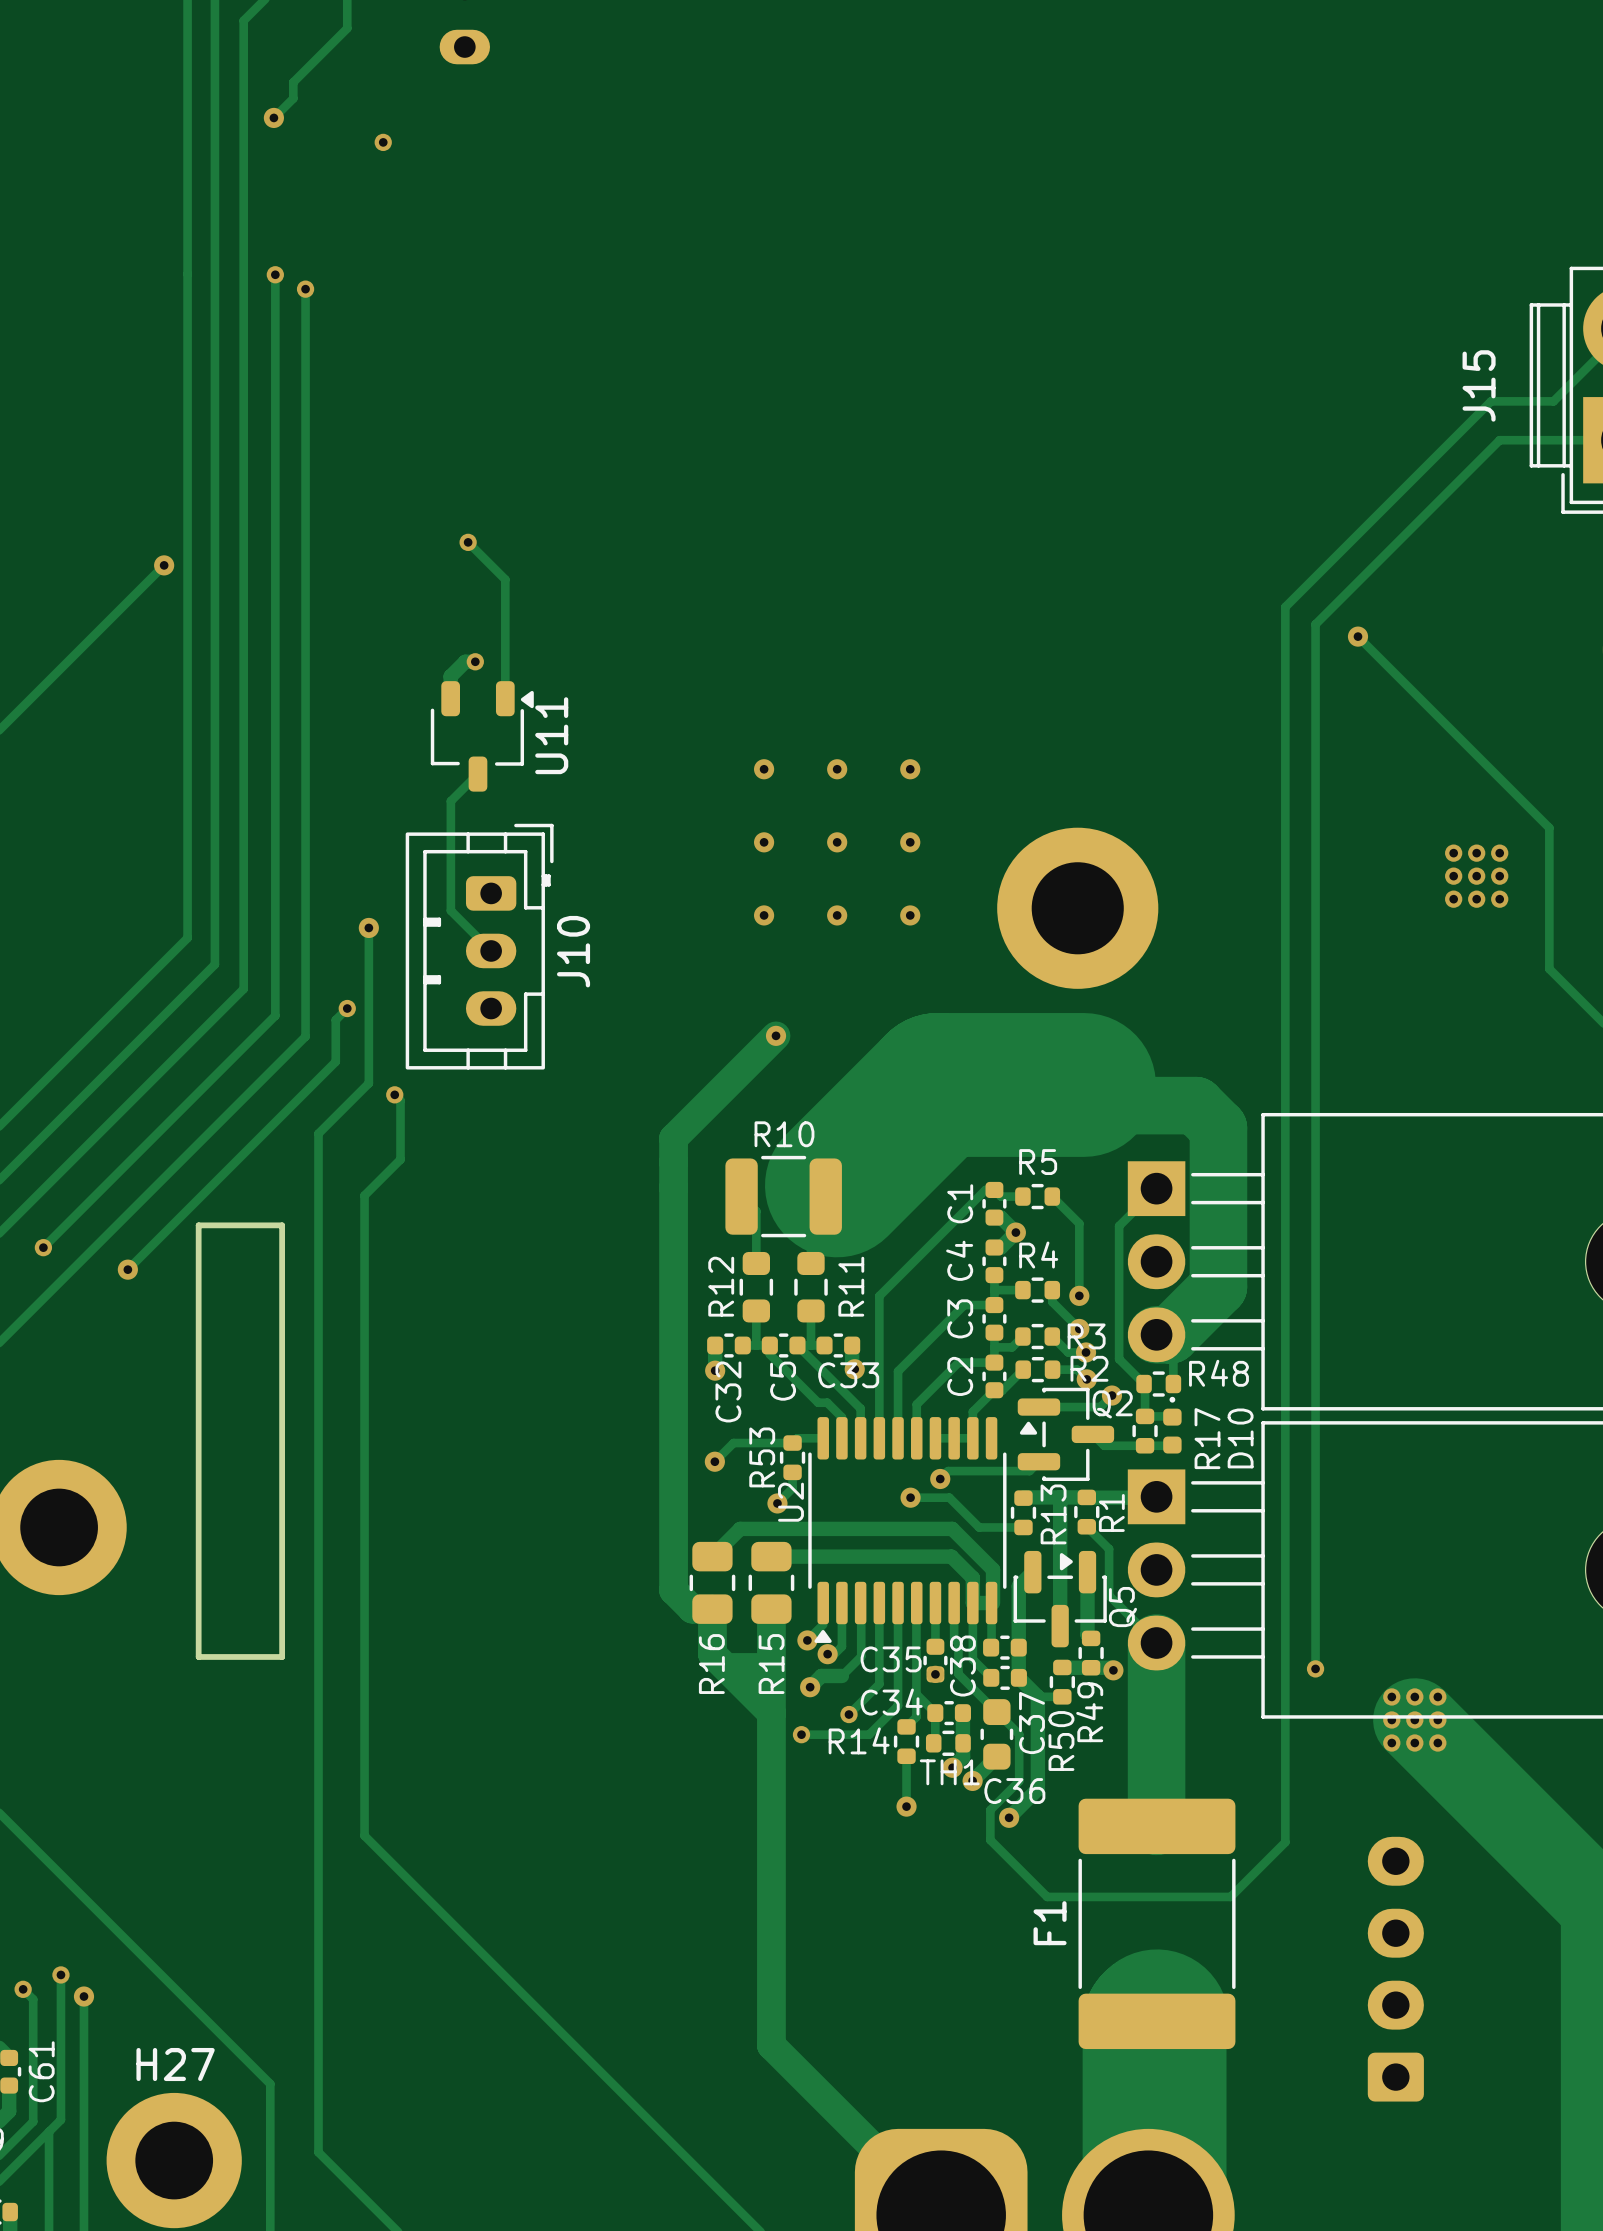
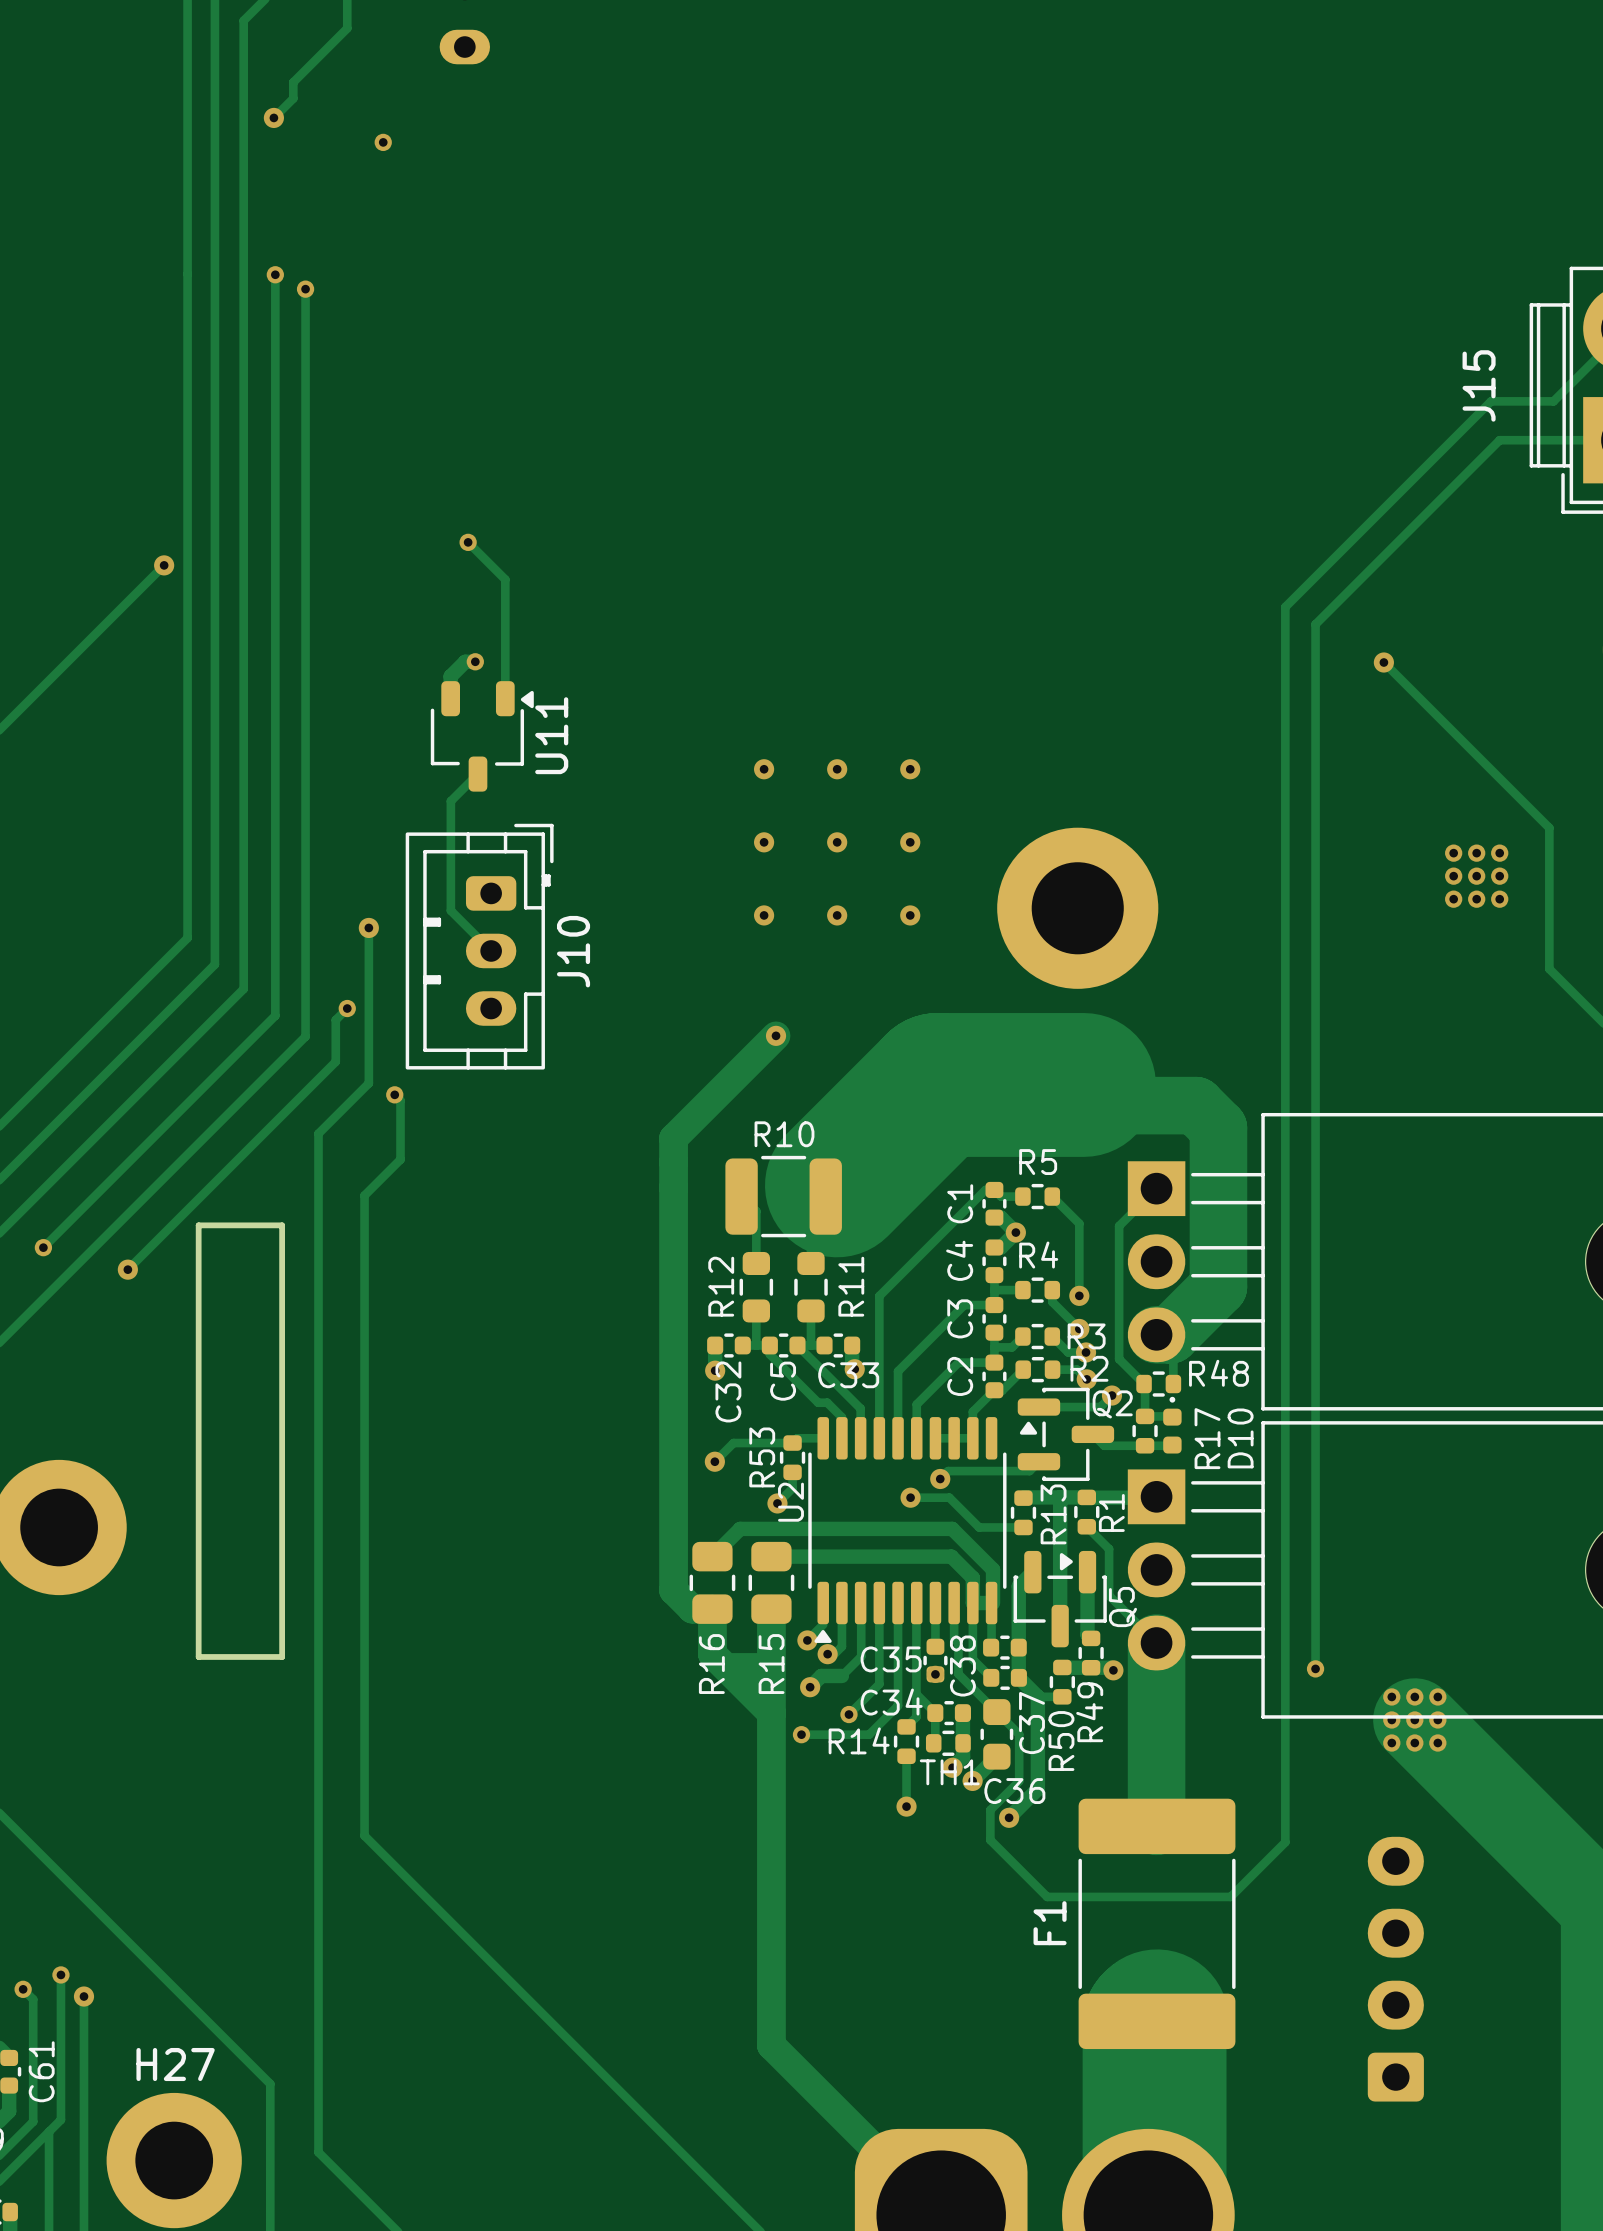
track: (1357, 636) (1383, 662) -> none
via position: (1357, 636) -> (1383, 662)

